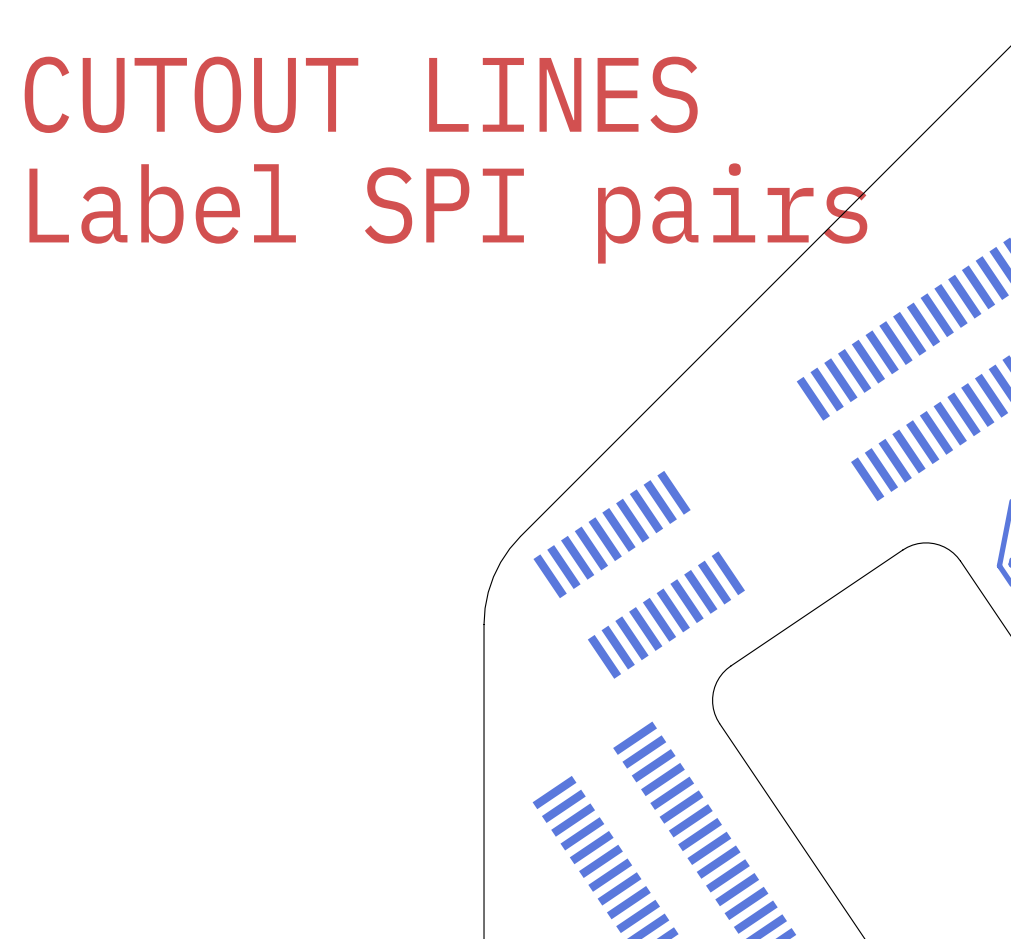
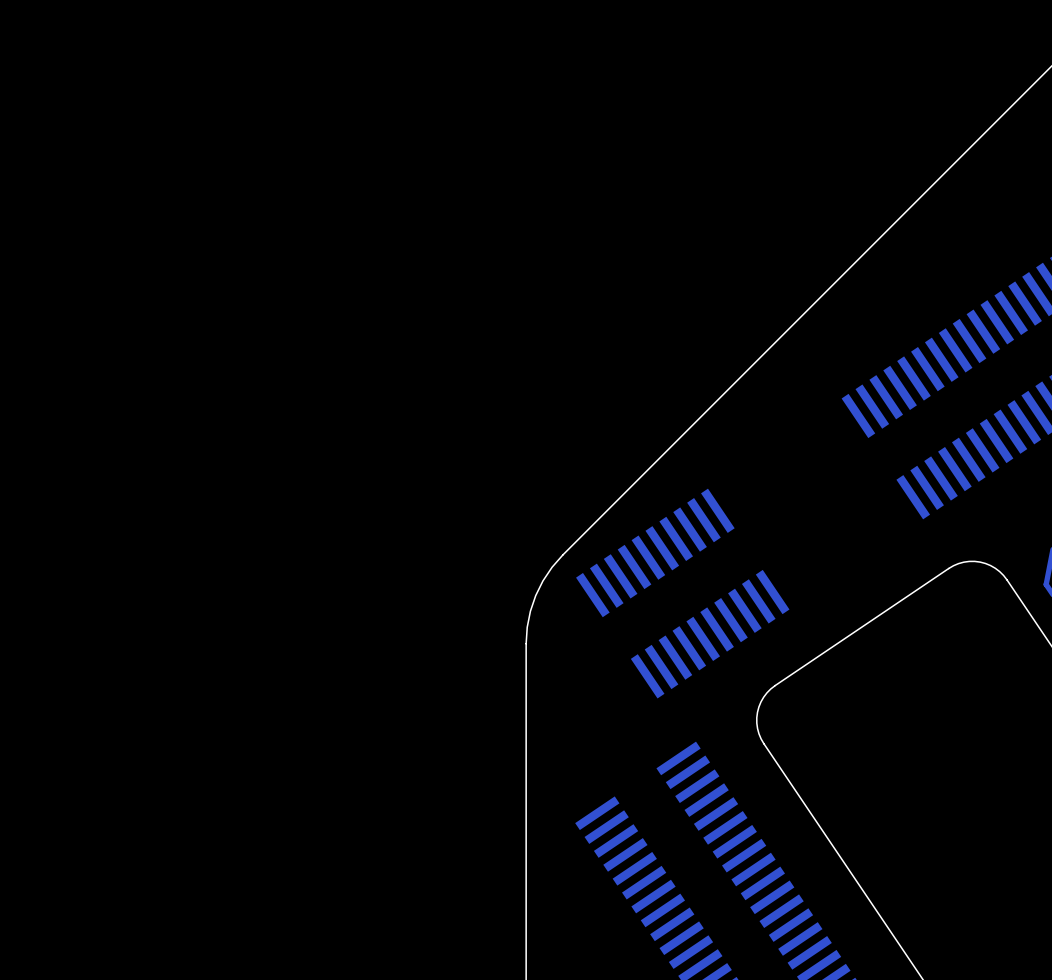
text: CUTOUT LINES (361, 94) -> none
text: Label SPI pairs (448, 213) -> none

